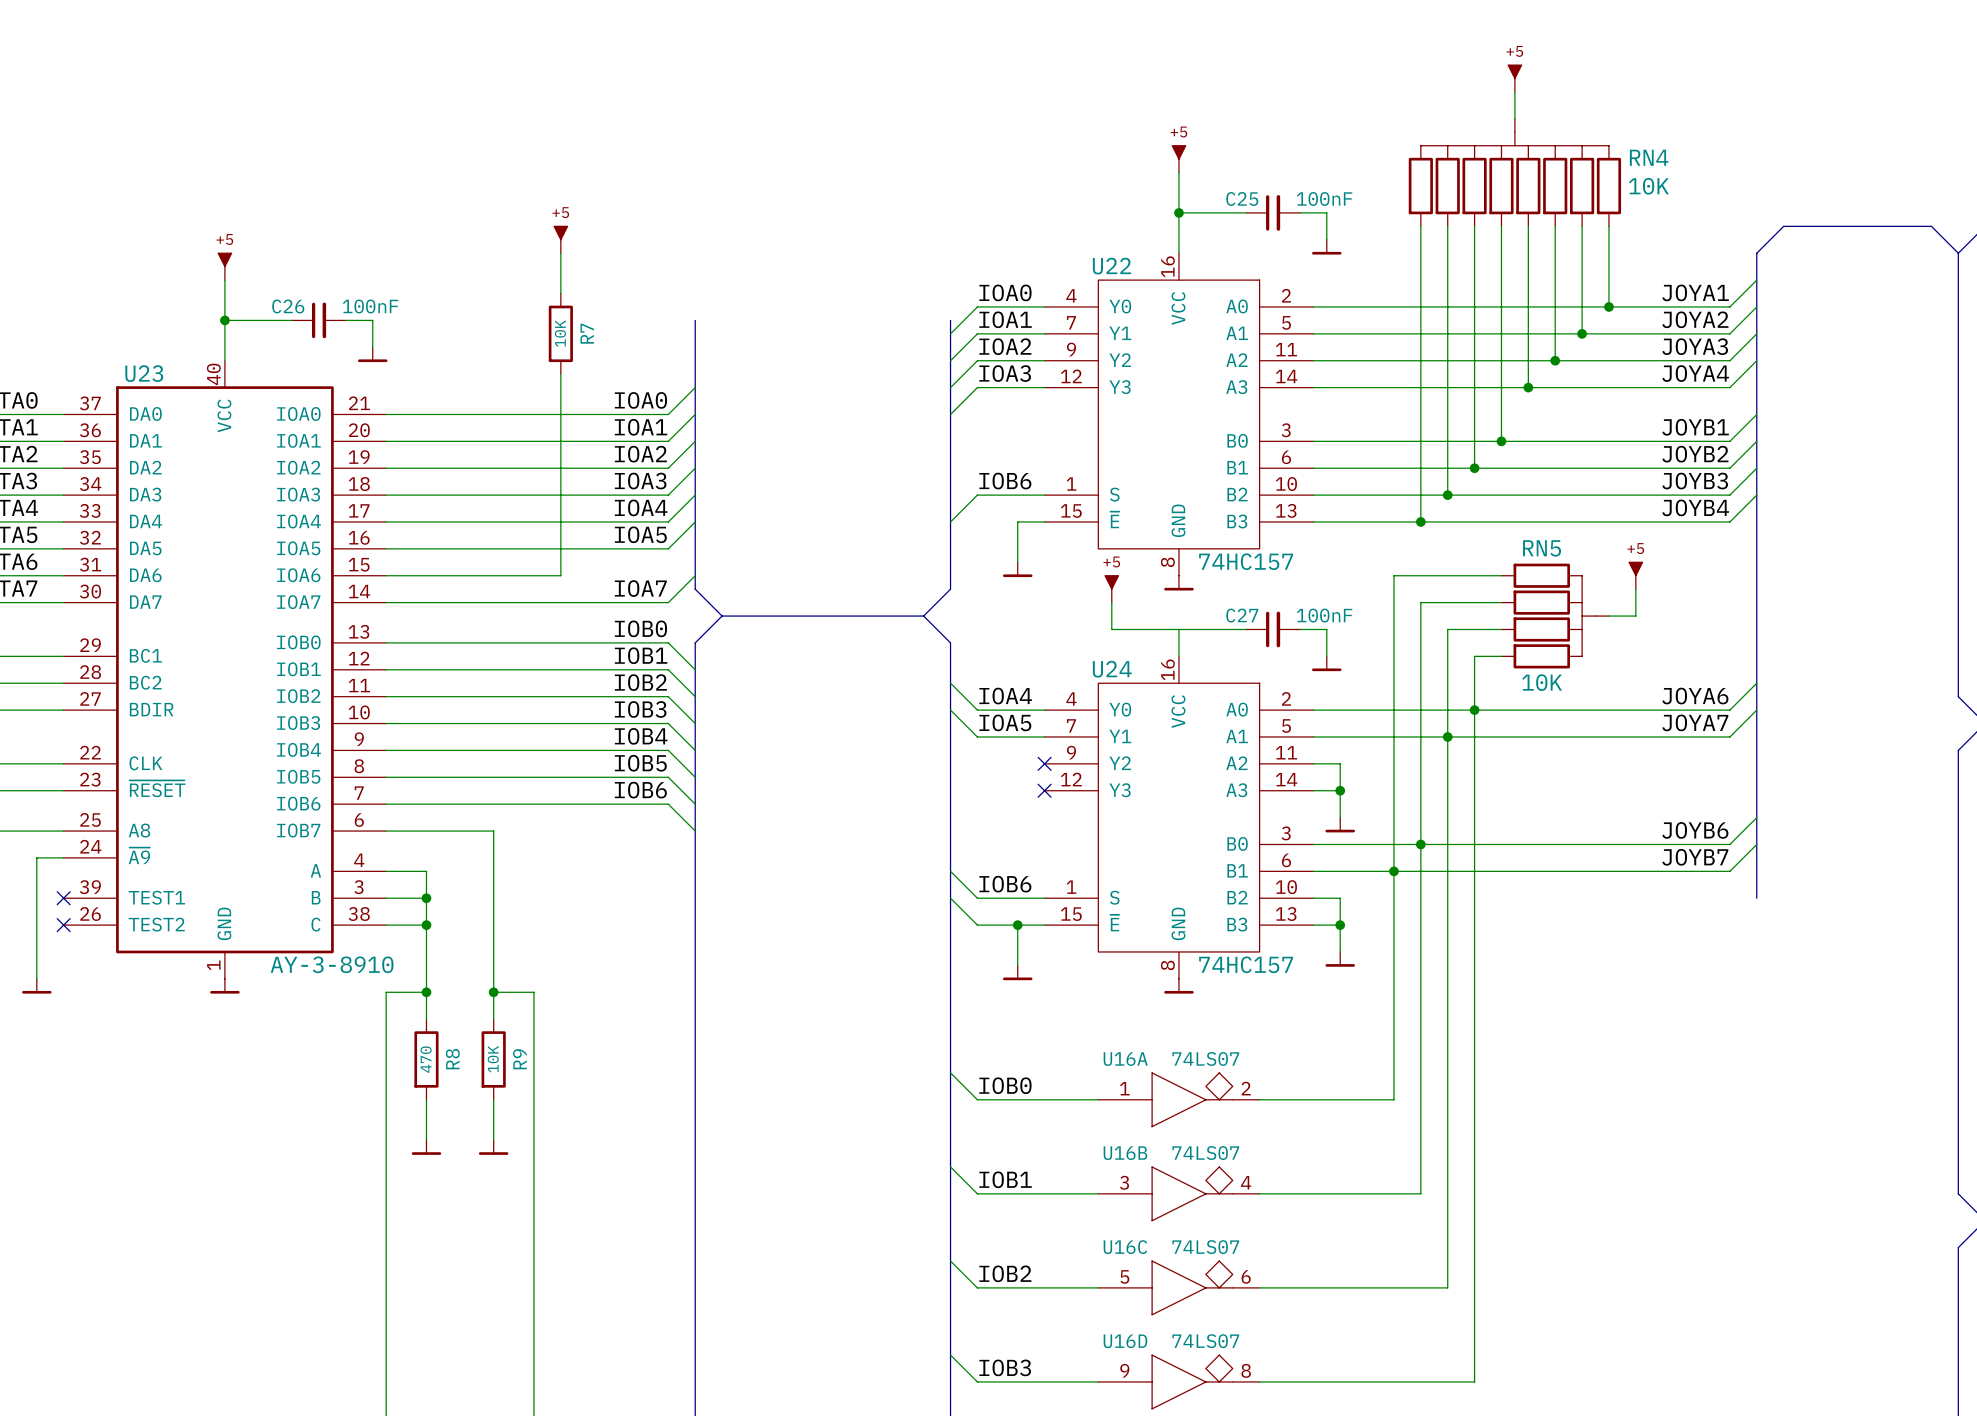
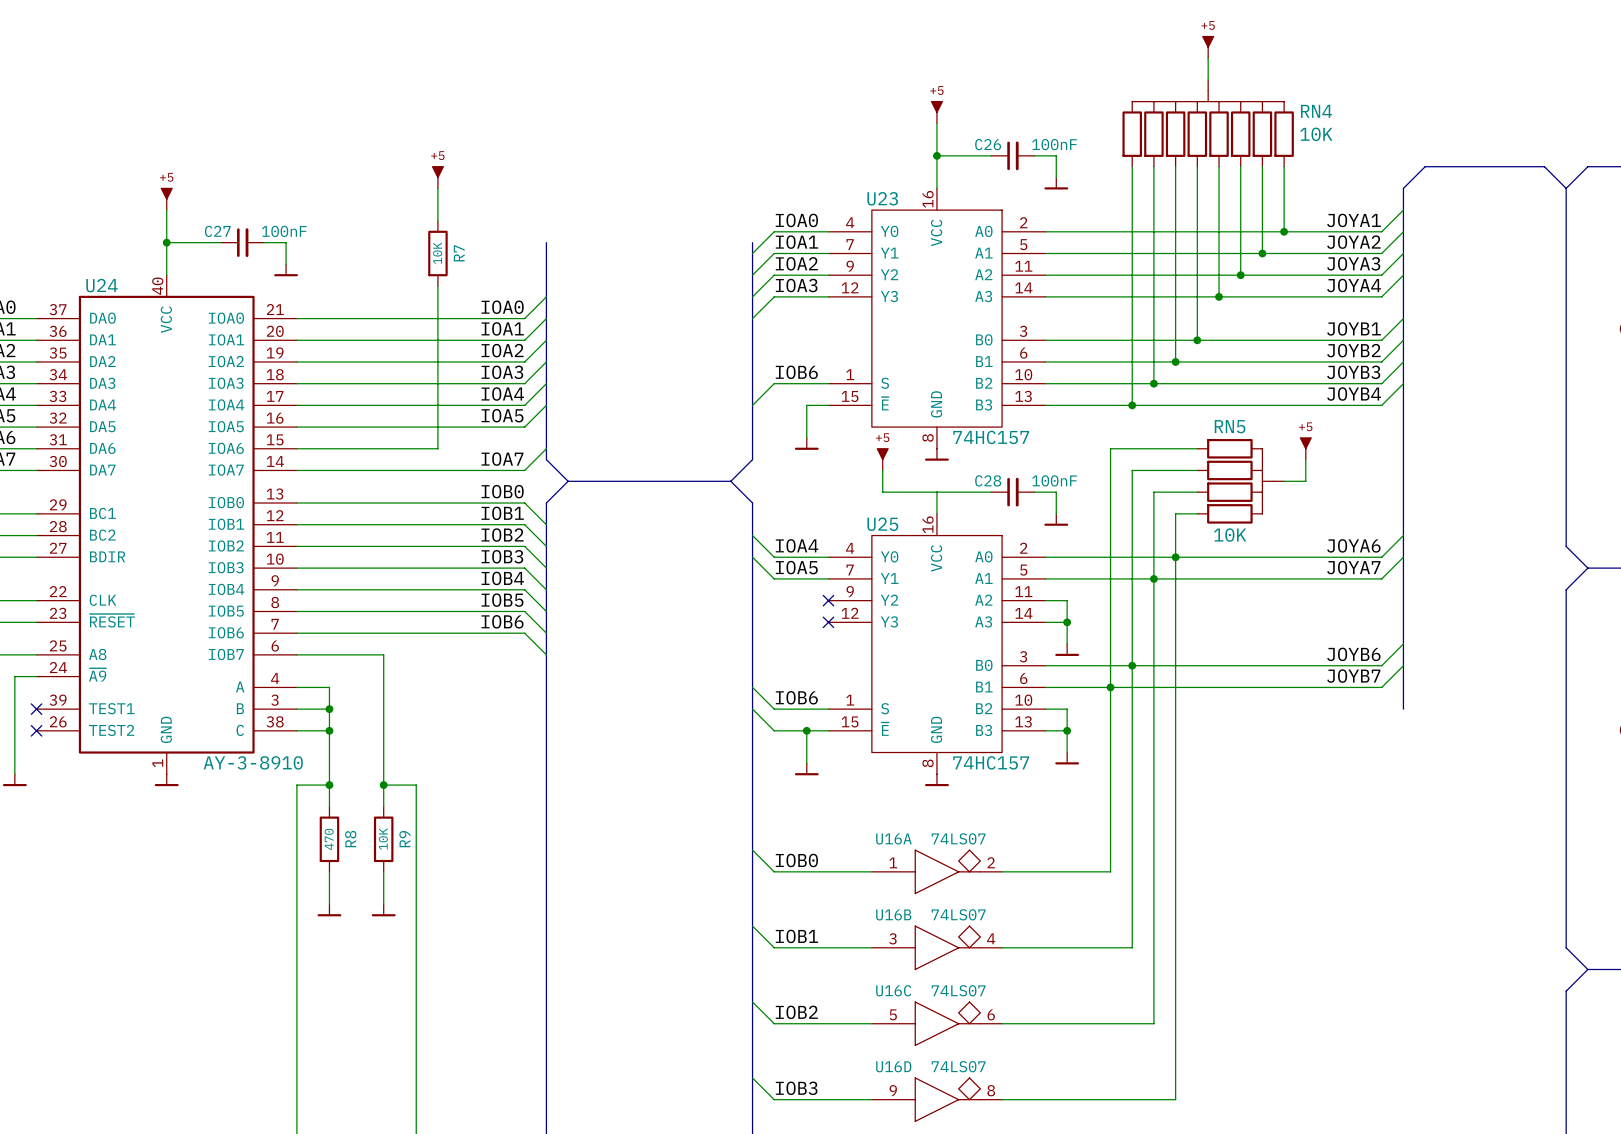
C25 name: C25 (1242, 198) -> C26 (988, 144)
U22 name: U22 (1111, 266) -> U23 (882, 198)
C26 name: C26 (288, 306) -> C27 (217, 231)
U23 name: U23 (144, 373) -> U24 (102, 285)
C27 name: C27 (1242, 615) -> C28 (988, 480)
U24 name: U24 (1112, 669) -> U25 (882, 524)

